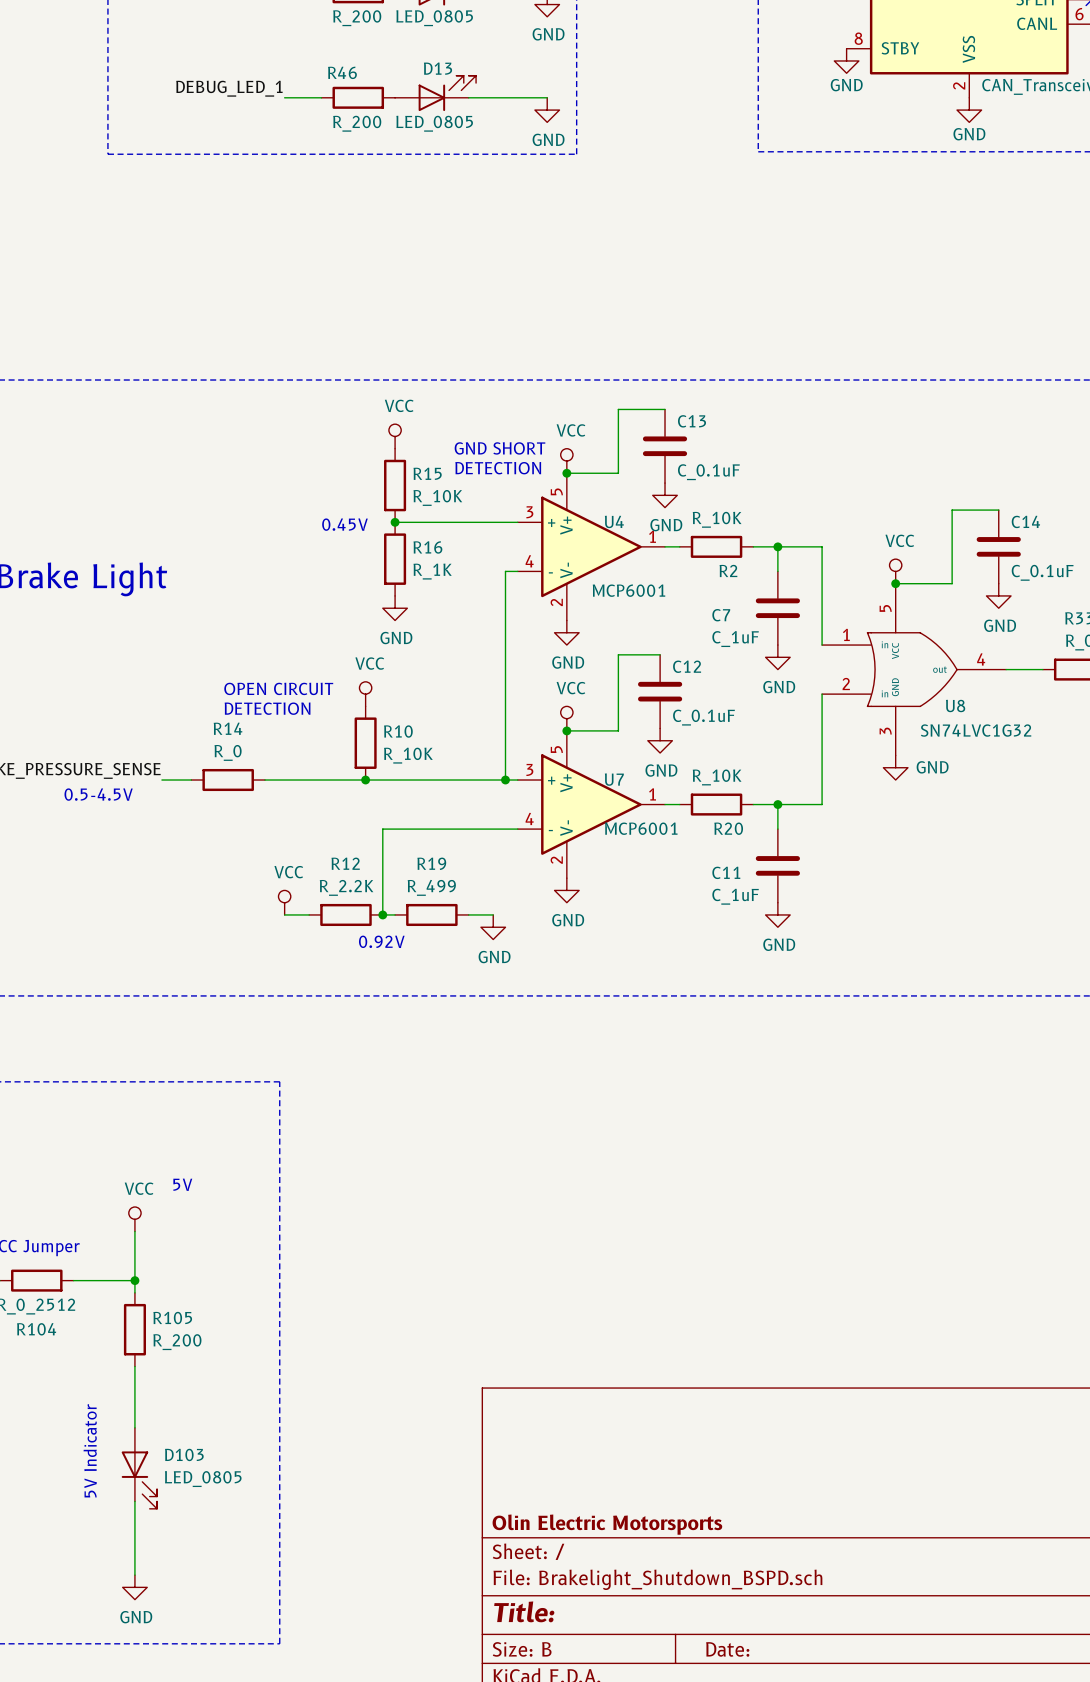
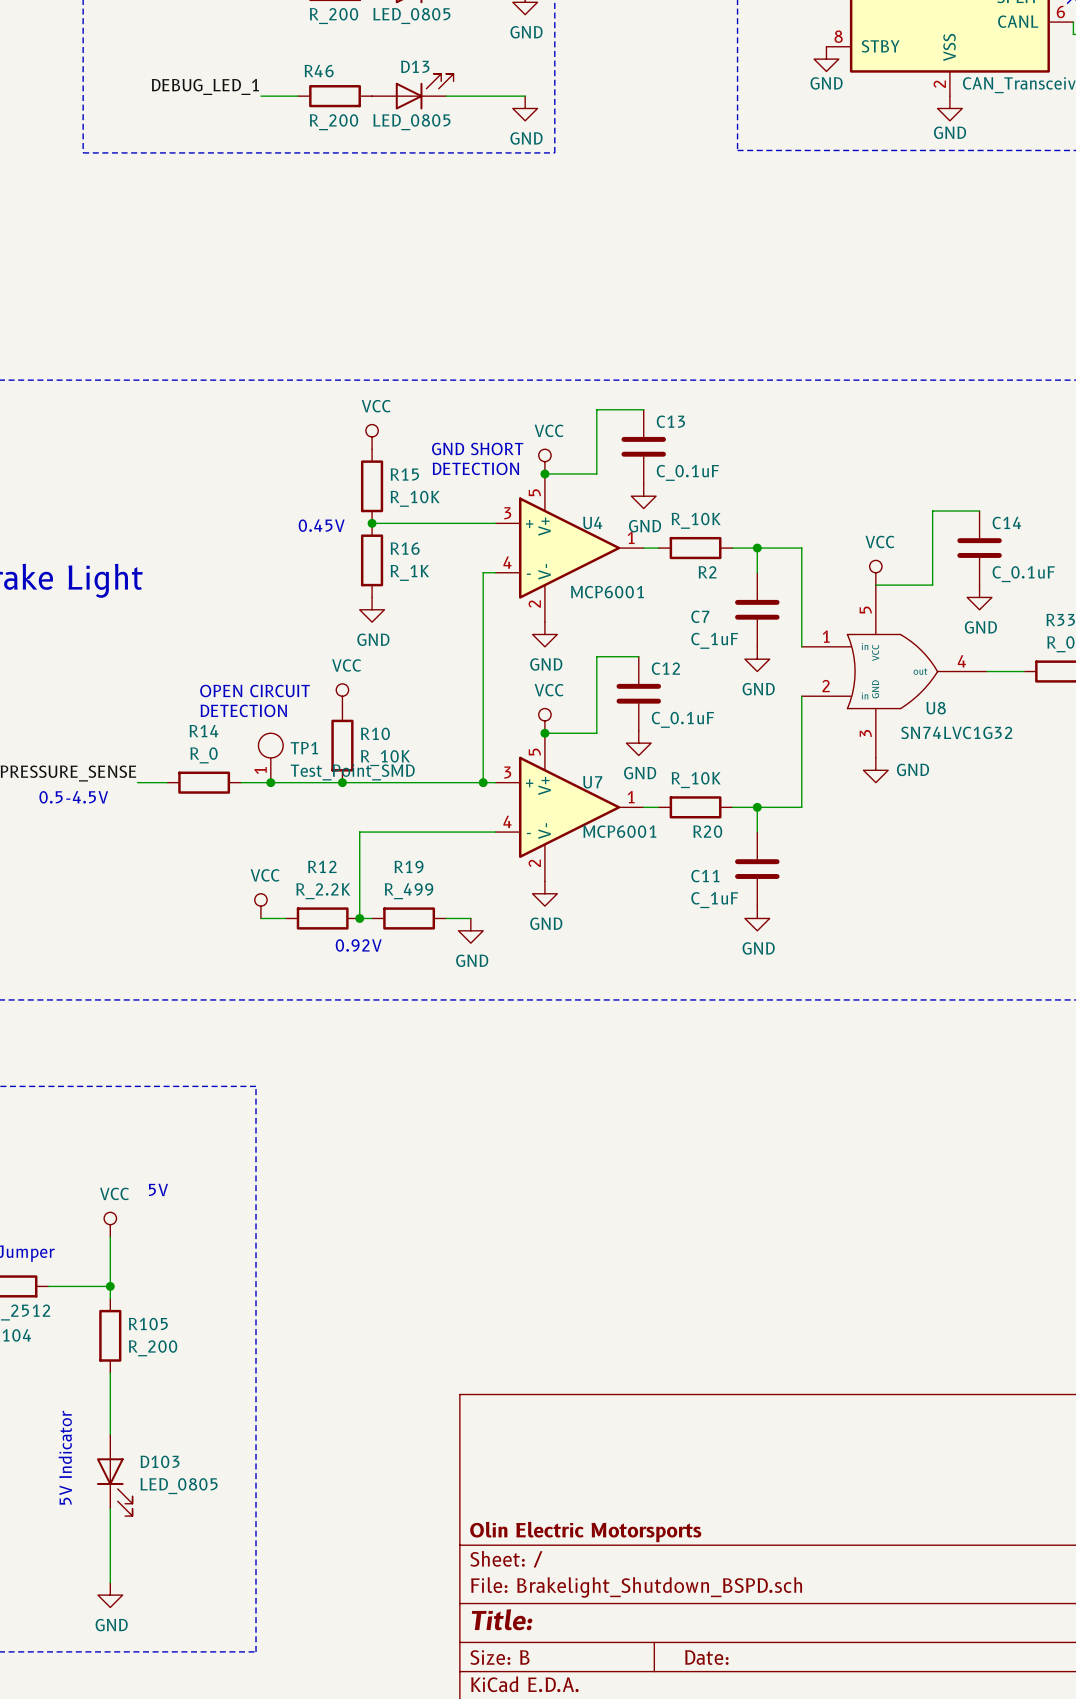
junction: (895, 583) -> none
TP1: none -> Test_Point_SMD (270, 757)
junction: none -> (270, 782)

